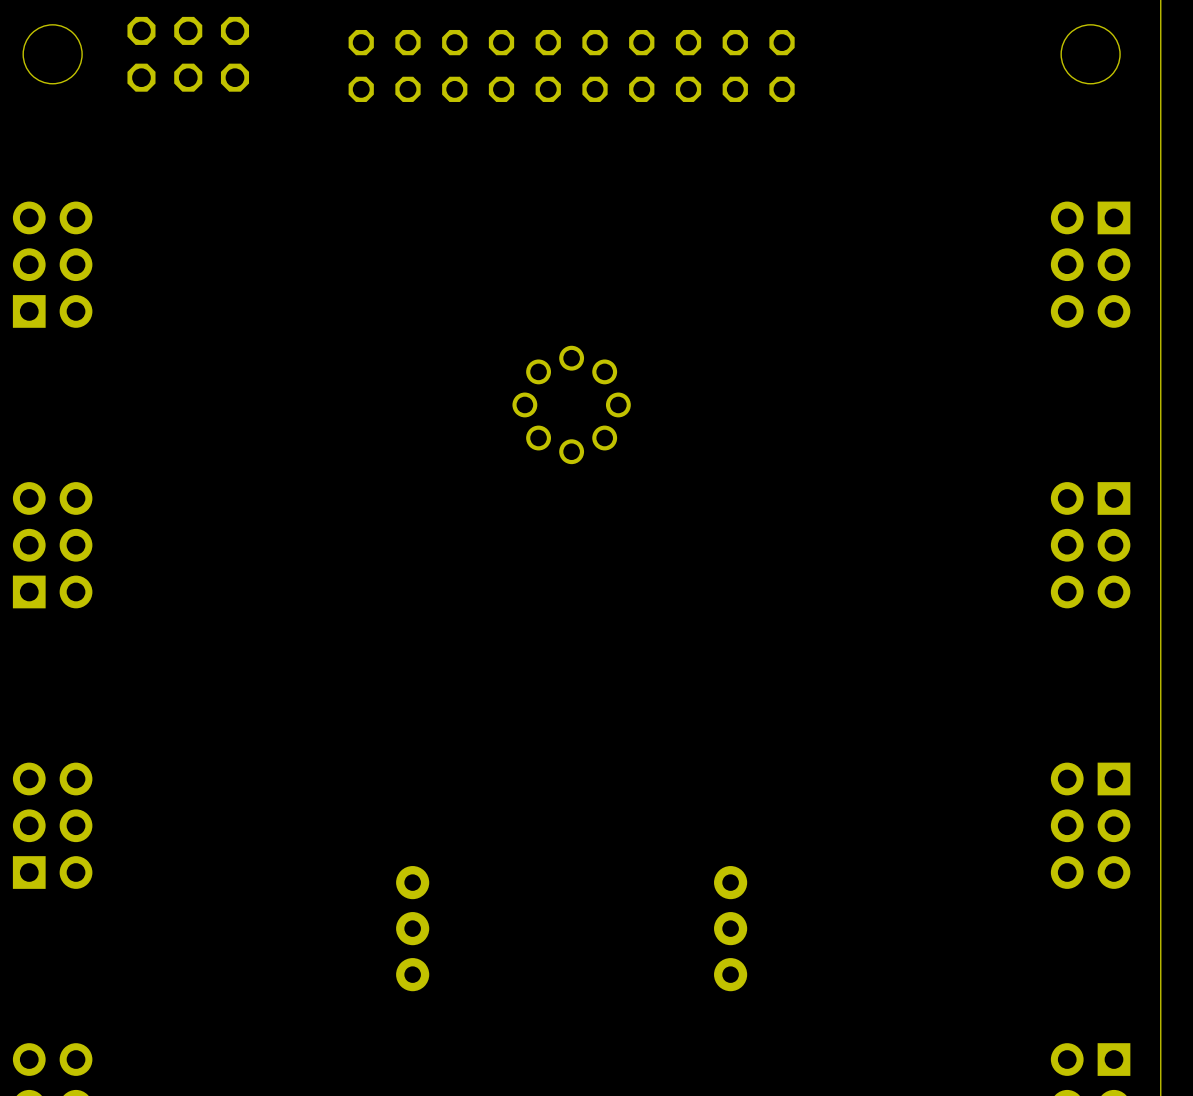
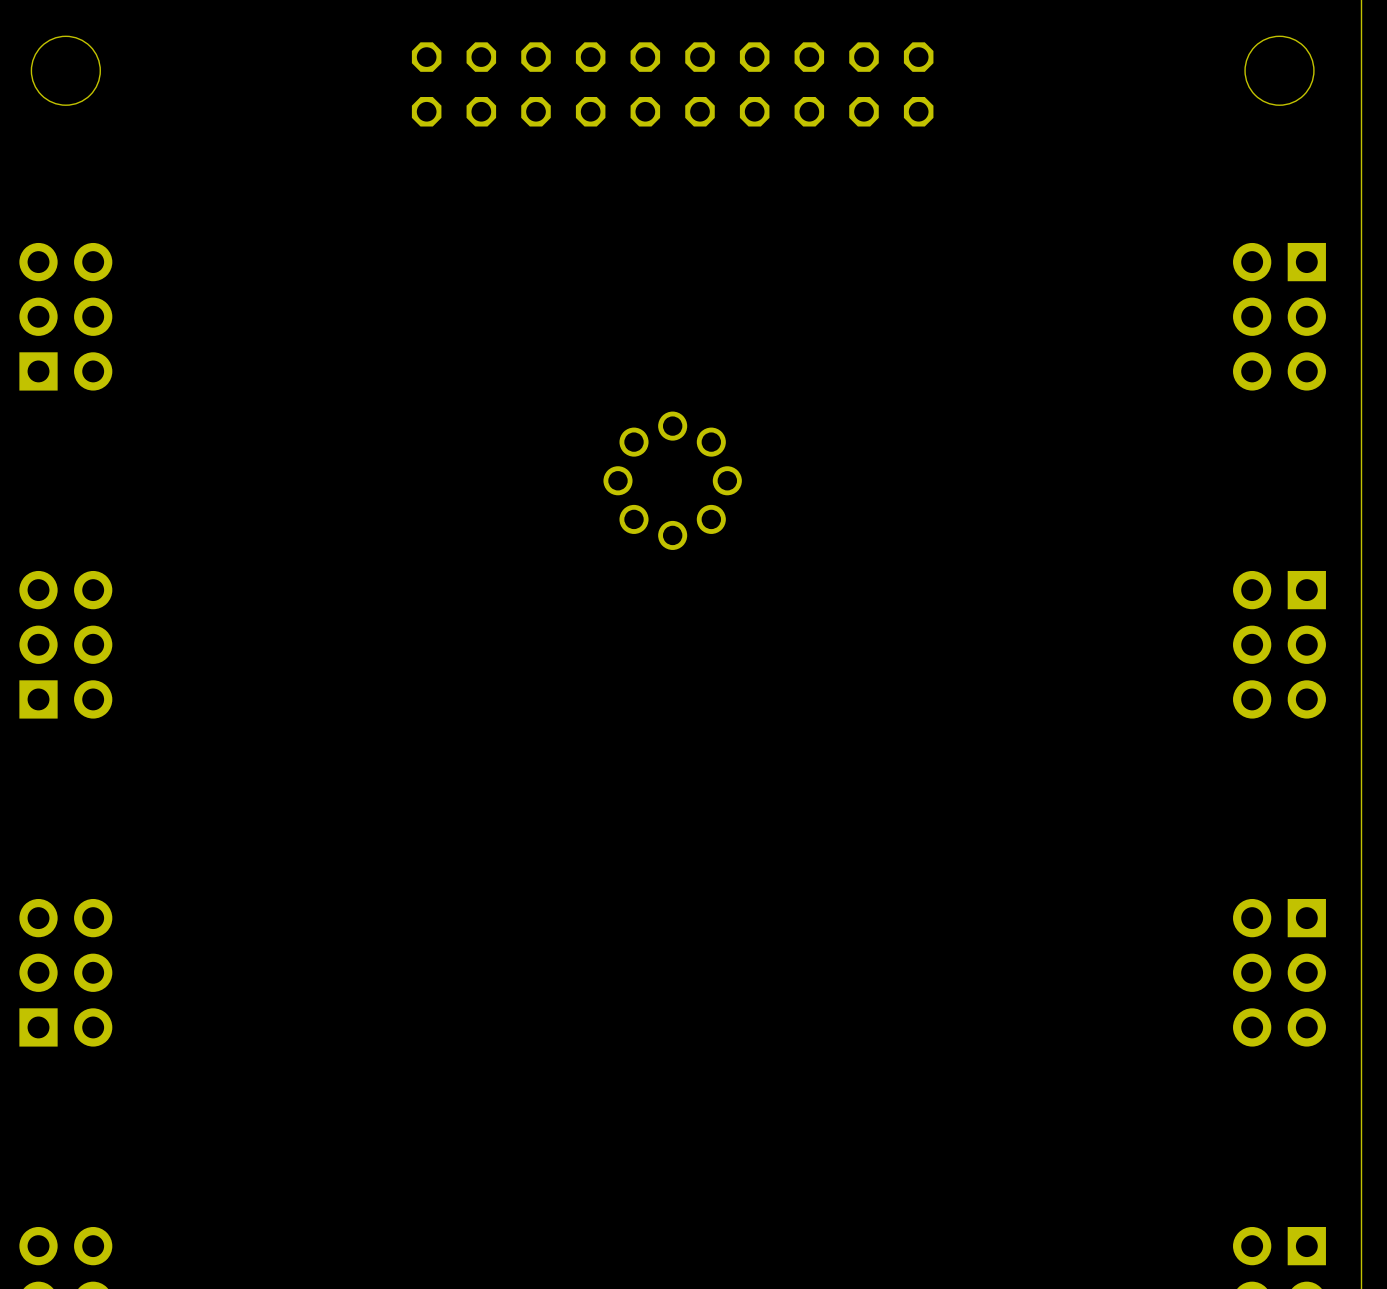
part: (188, 54) -> none
part: (412, 928) -> none
part: (730, 928) -> none

